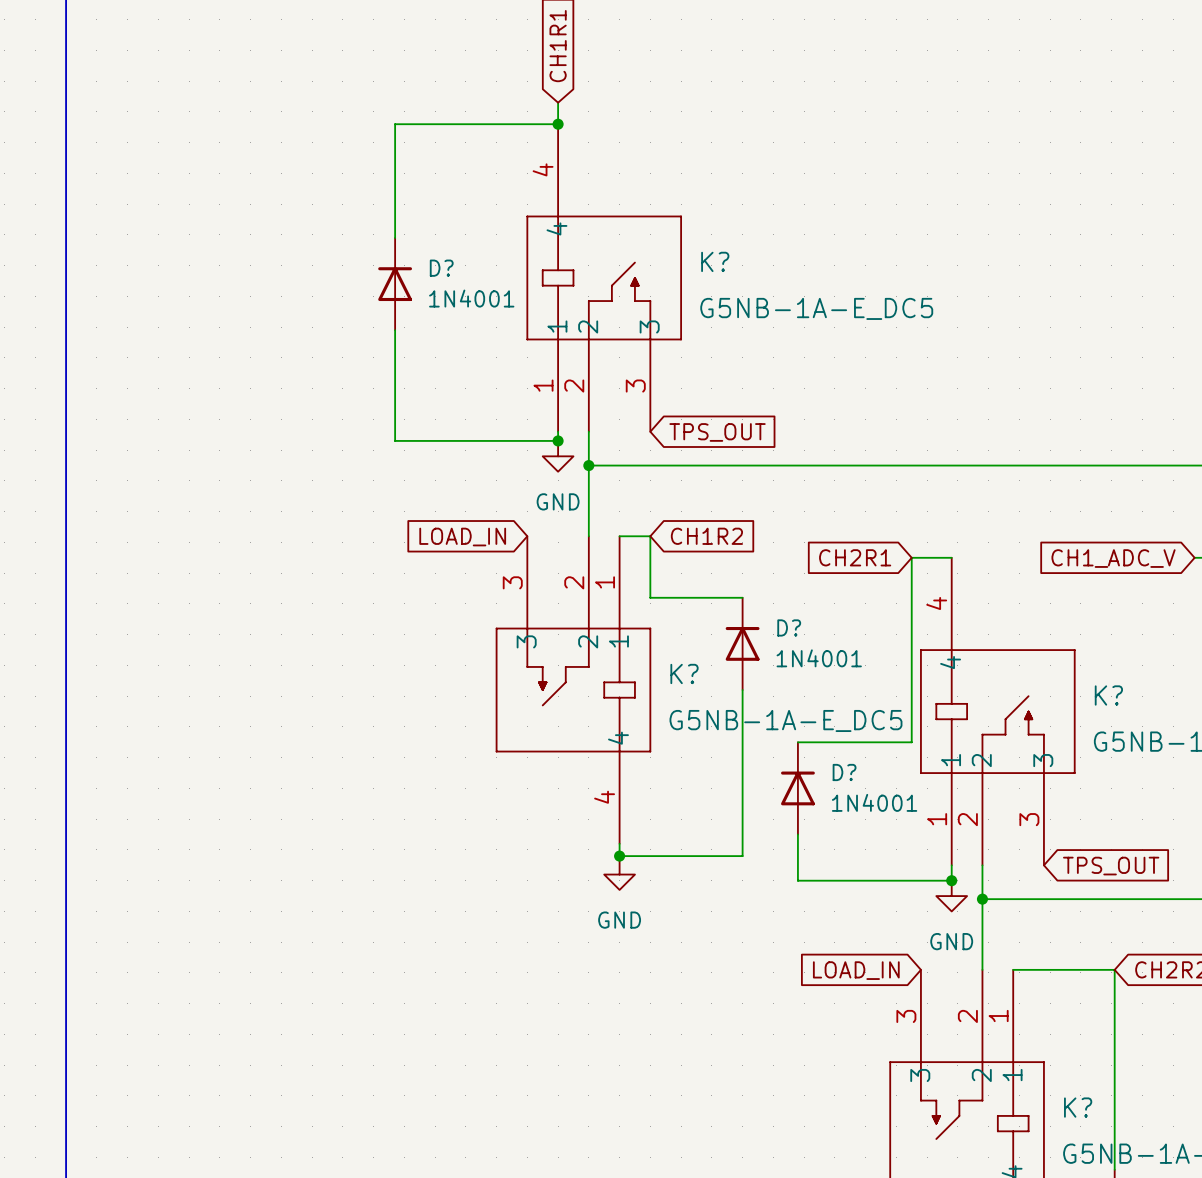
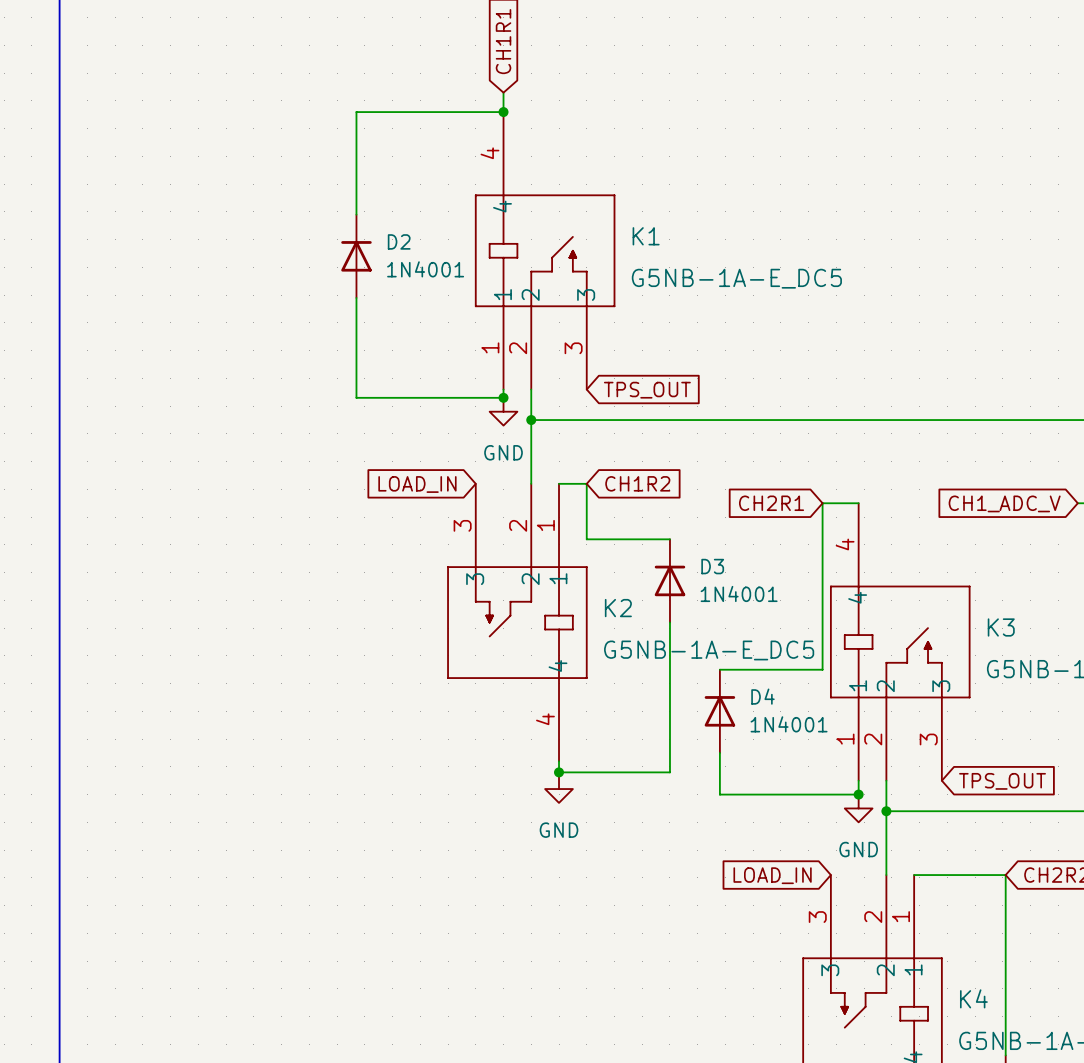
K? name: K? (715, 261) -> K1 (646, 236)
D? name: D? (441, 268) -> D2 (399, 241)
D? name: D? (789, 627) -> D3 (712, 566)
K? name: K? (684, 673) -> K2 (618, 608)
K? name: K? (1108, 695) -> K3 (1001, 627)
D? name: D? (844, 772) -> D4 (762, 696)
K? name: K? (1078, 1107) -> K4 (973, 998)

